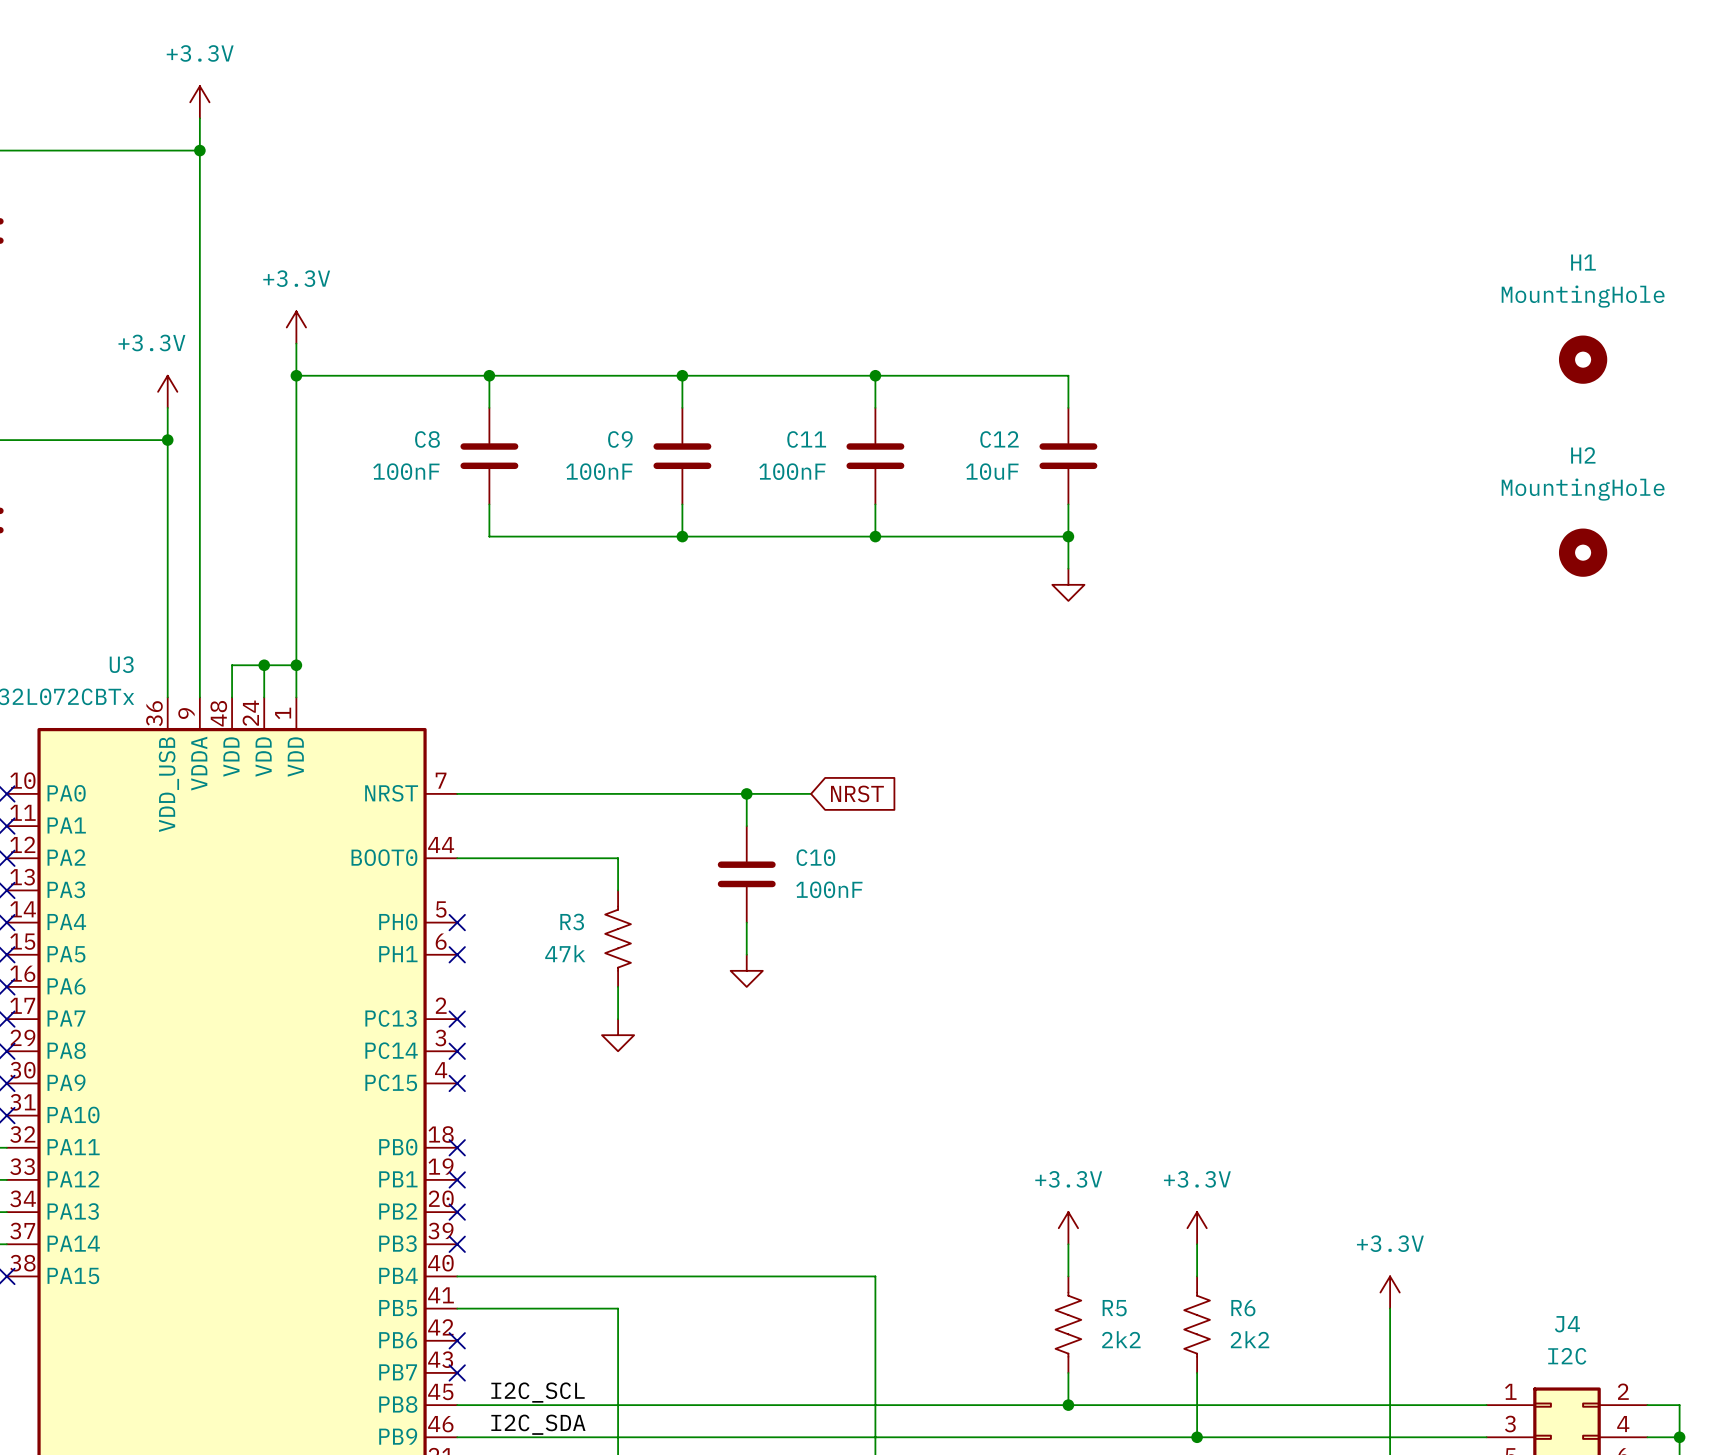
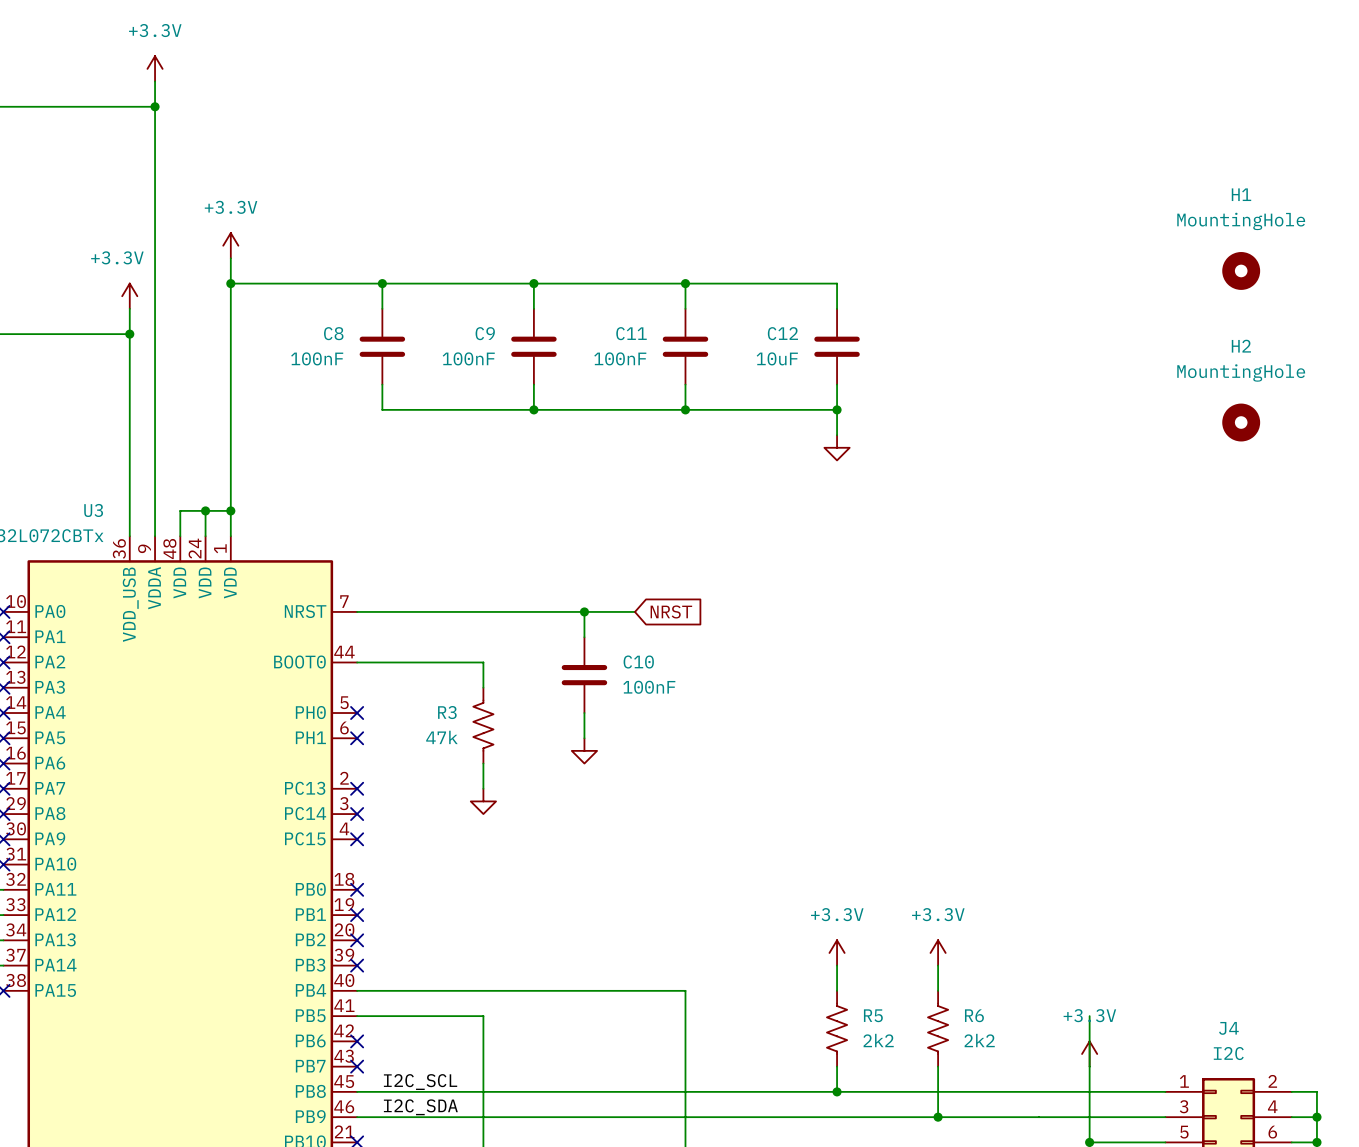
power symbol position: +3.3V (1390, 1292) -> +3.3V (1089, 1054)

